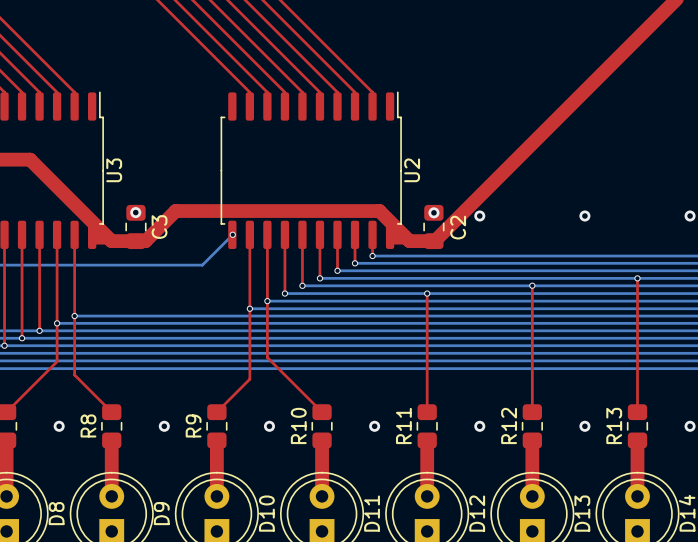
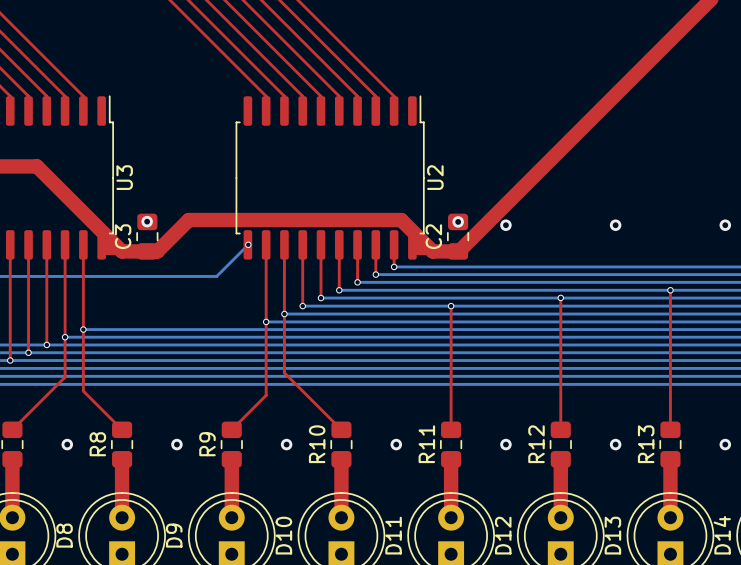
C3 name position: C3 (159, 227) -> C3 (123, 236)
C2 name position: C2 (458, 227) -> C2 (433, 236)

